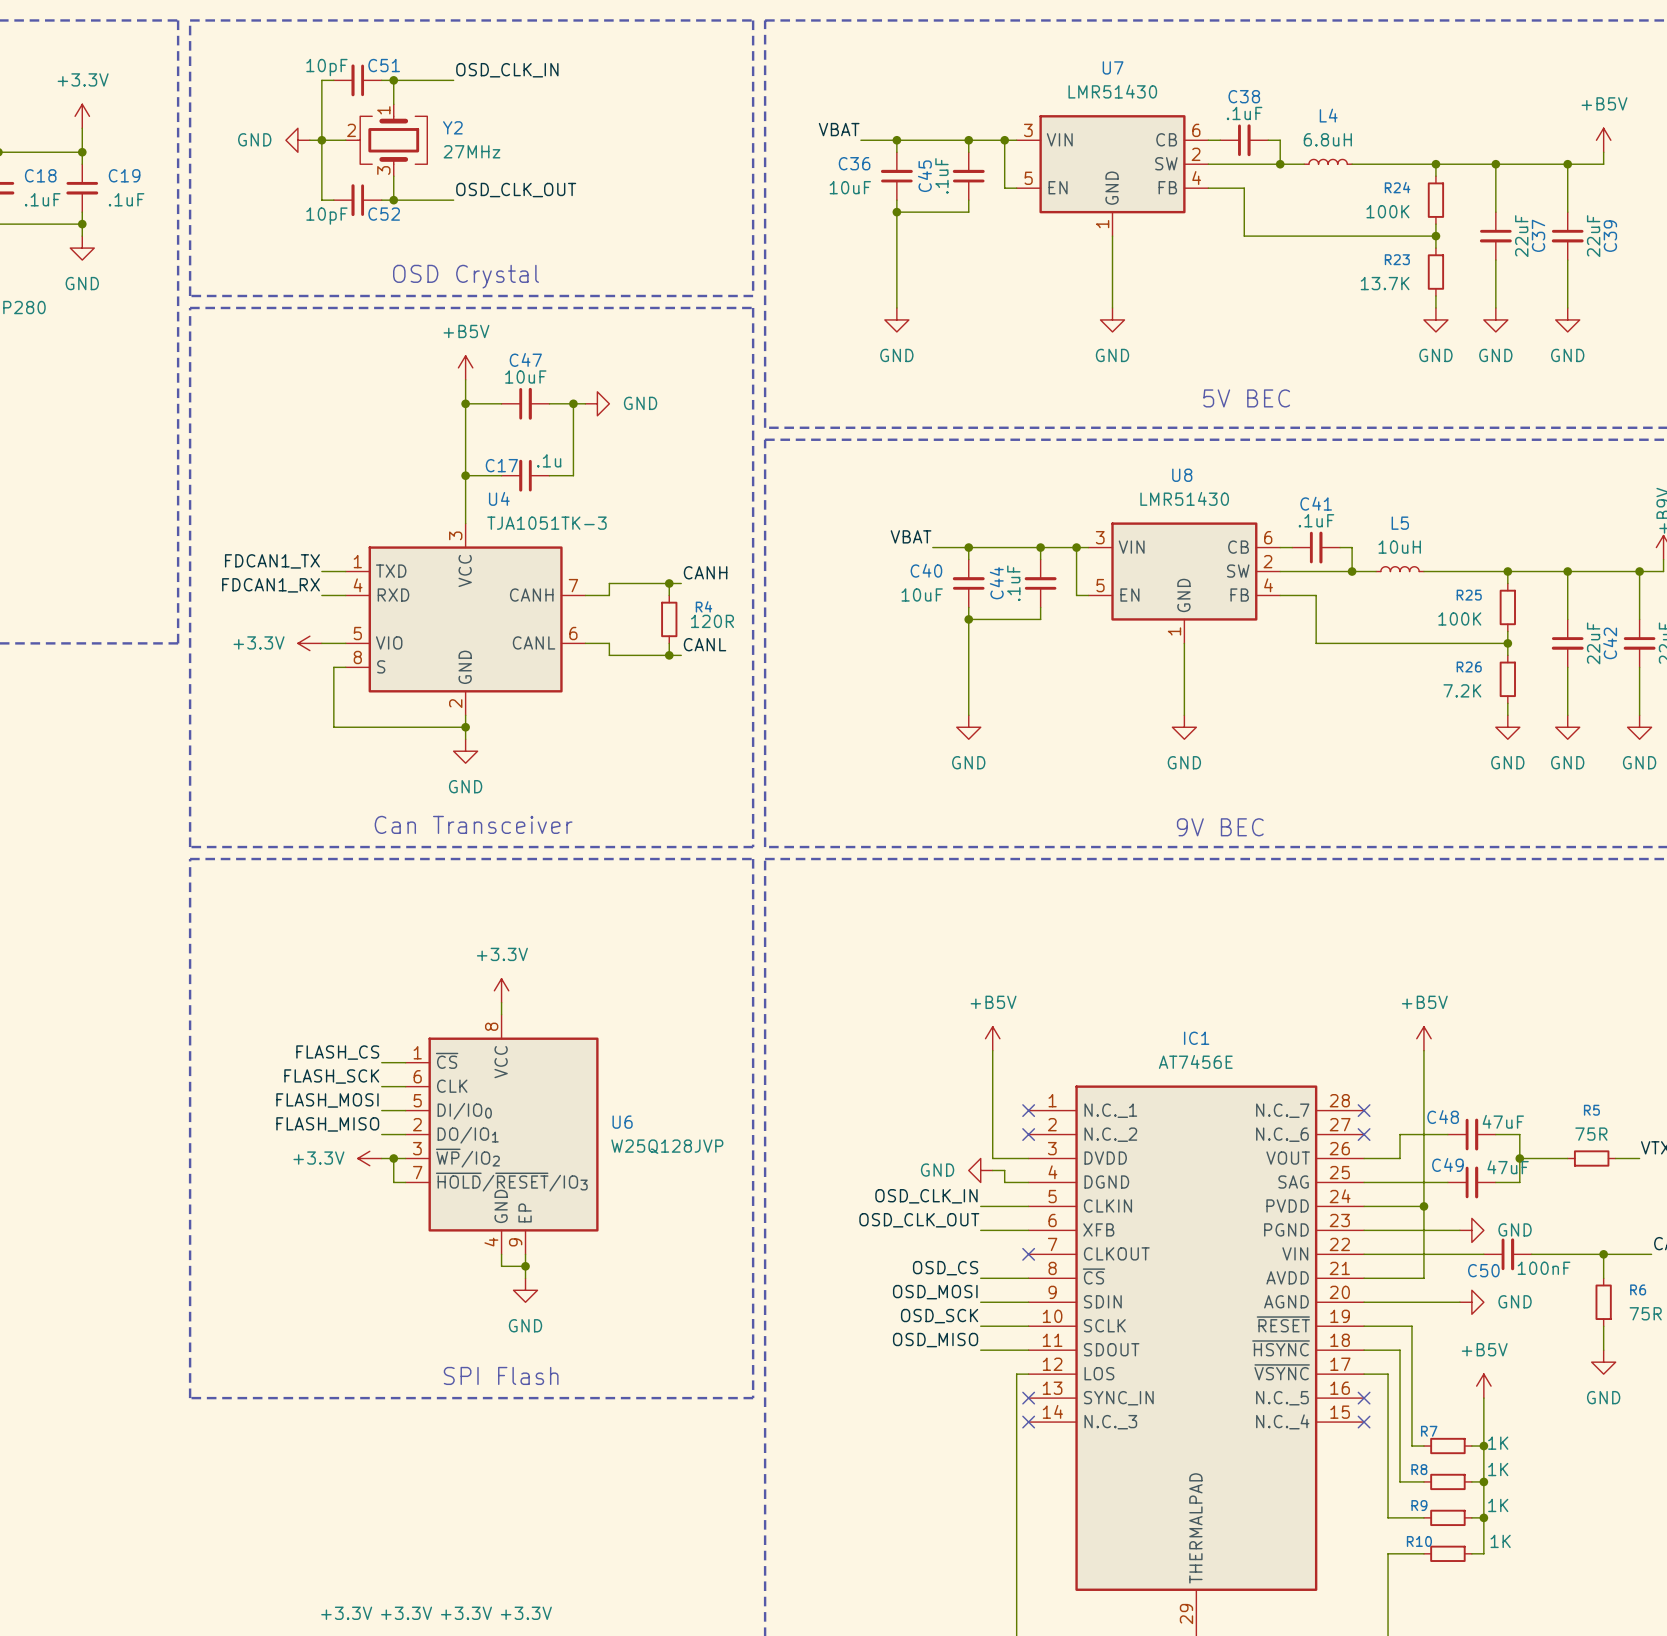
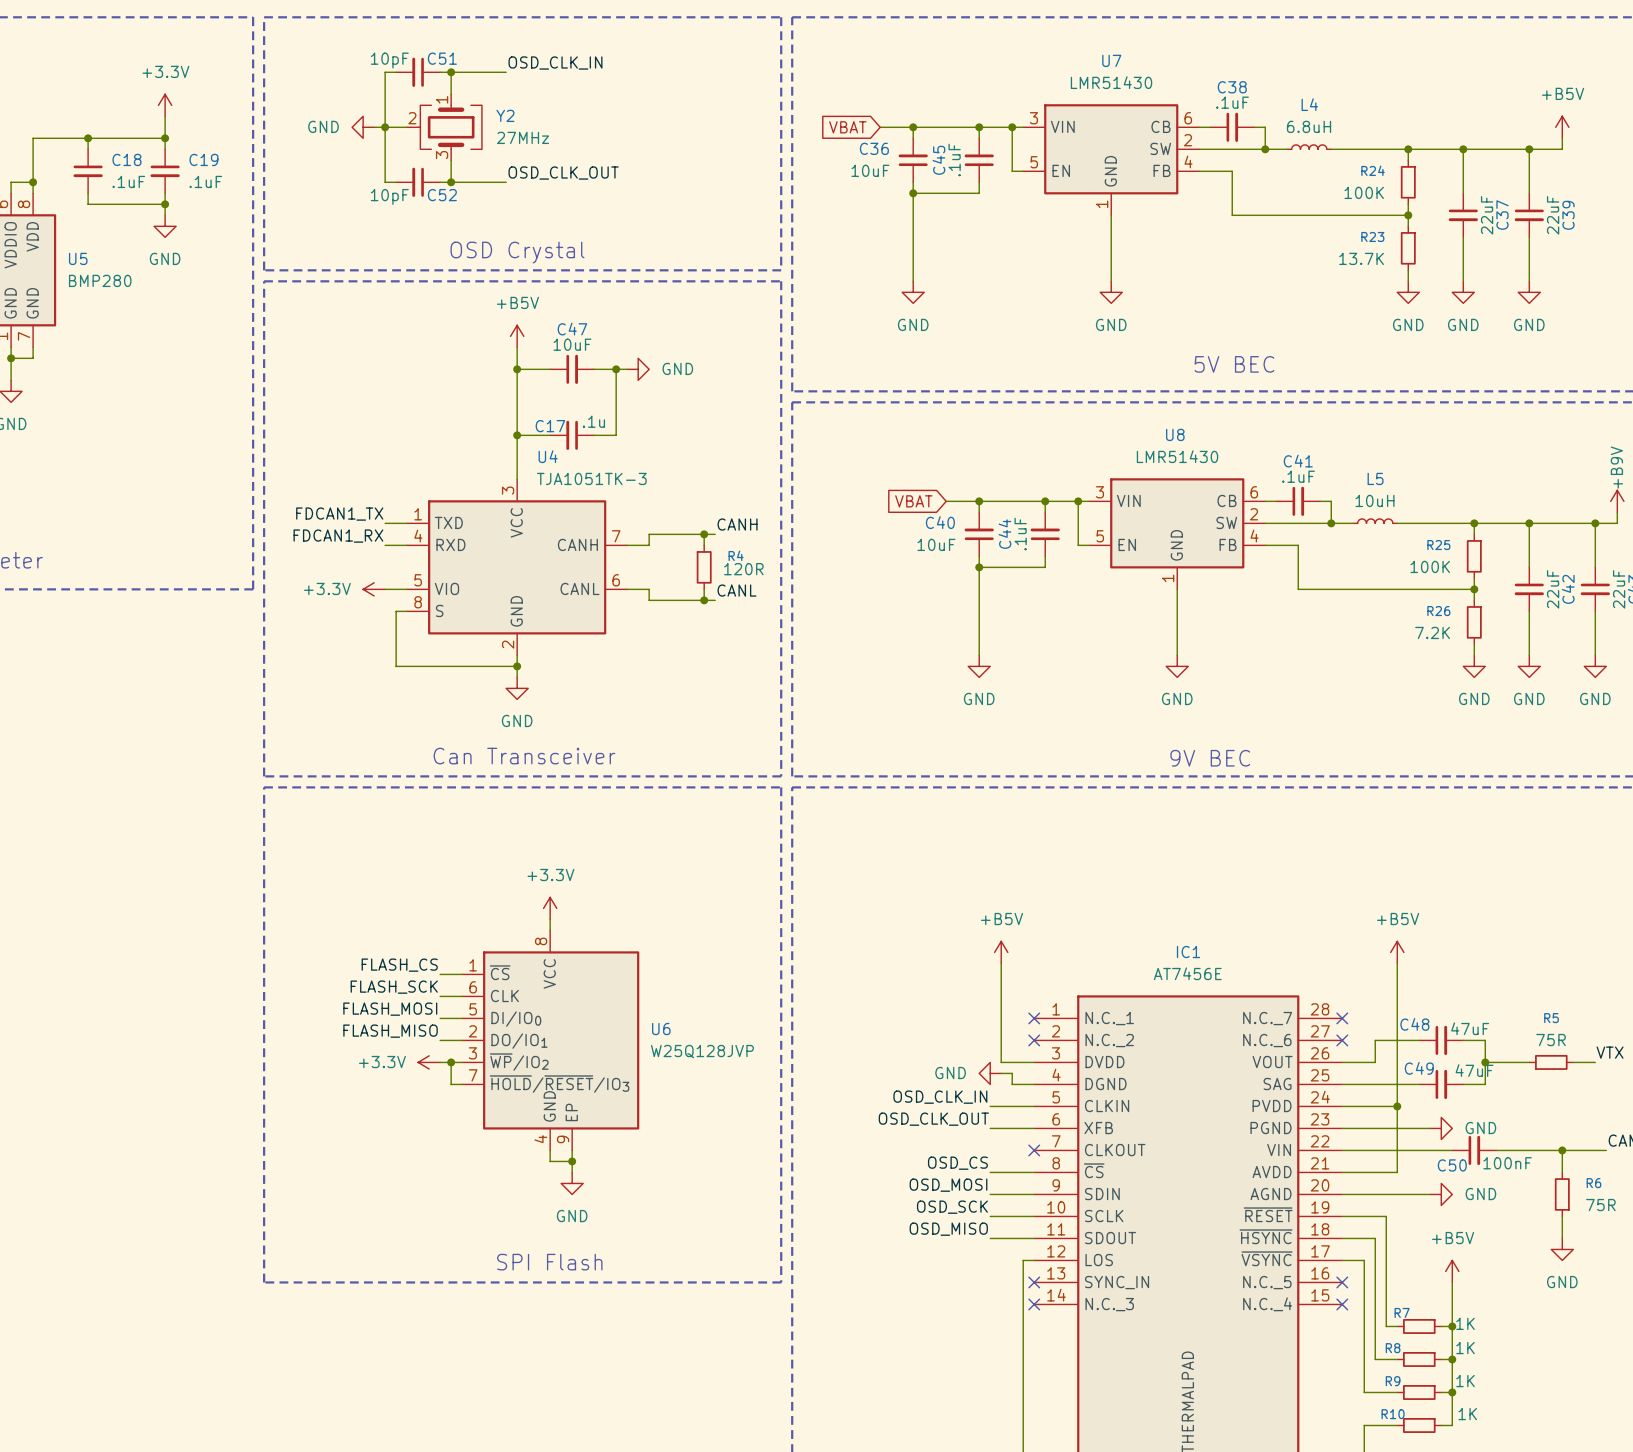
label: VBAT (839, 129) -> none
global label: none -> VBAT (847, 127)
label: VBAT (911, 536) -> none
global label: none -> VBAT (913, 501)

